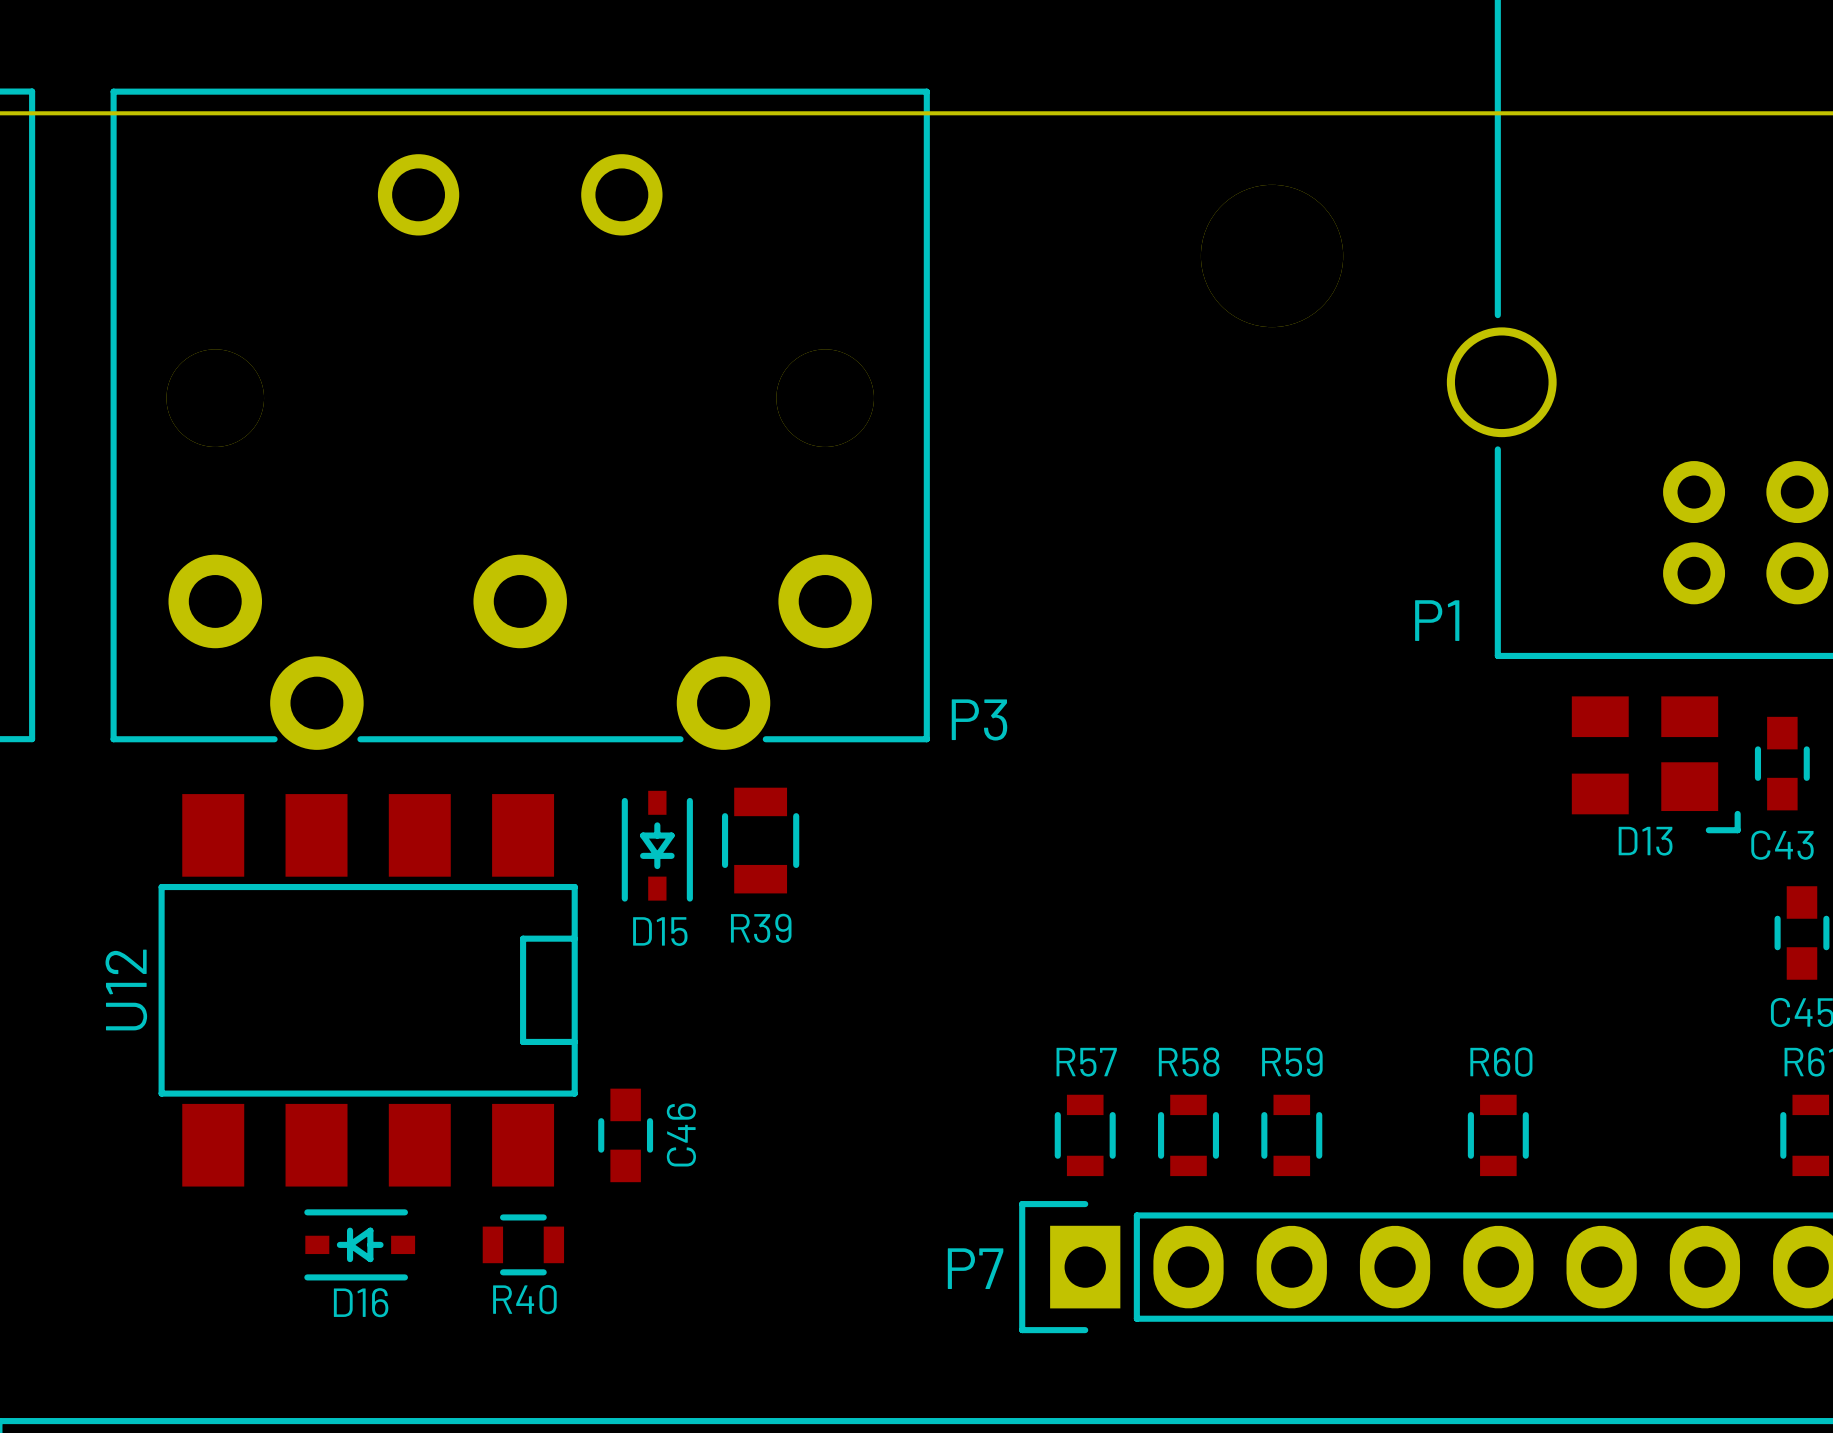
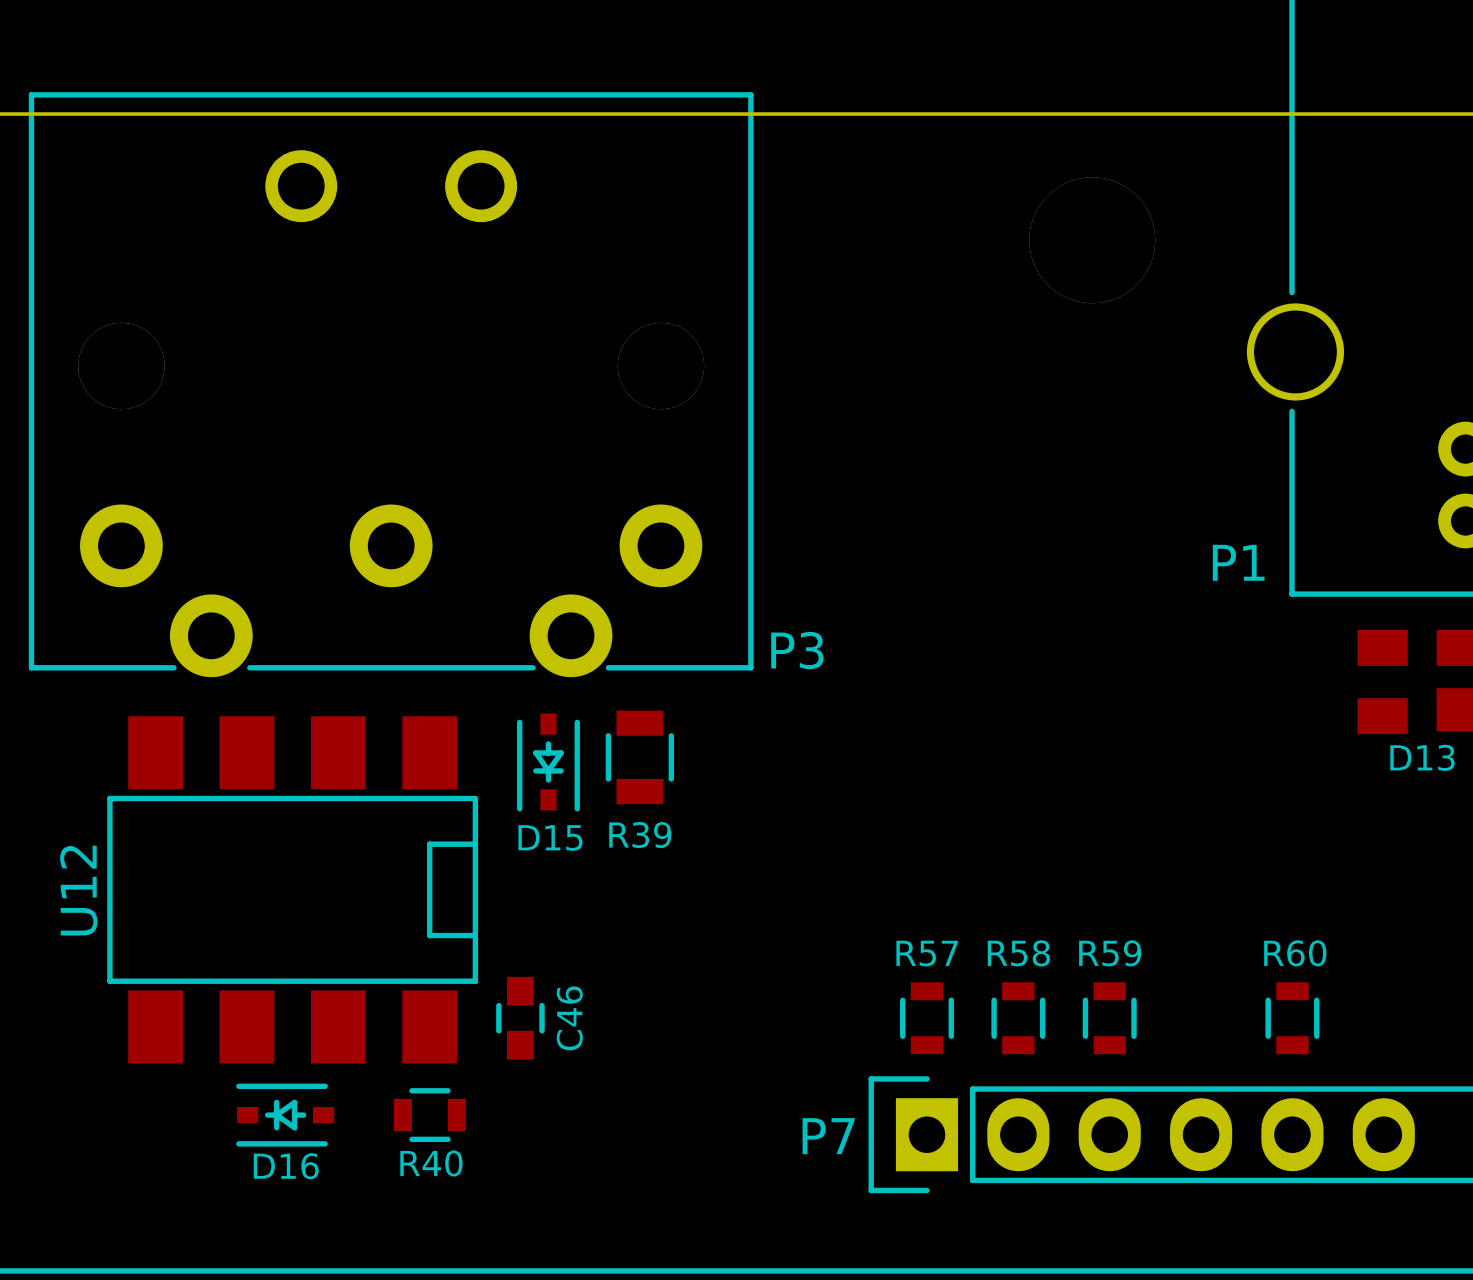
P3 position: (520, 419) -> (391, 384)

